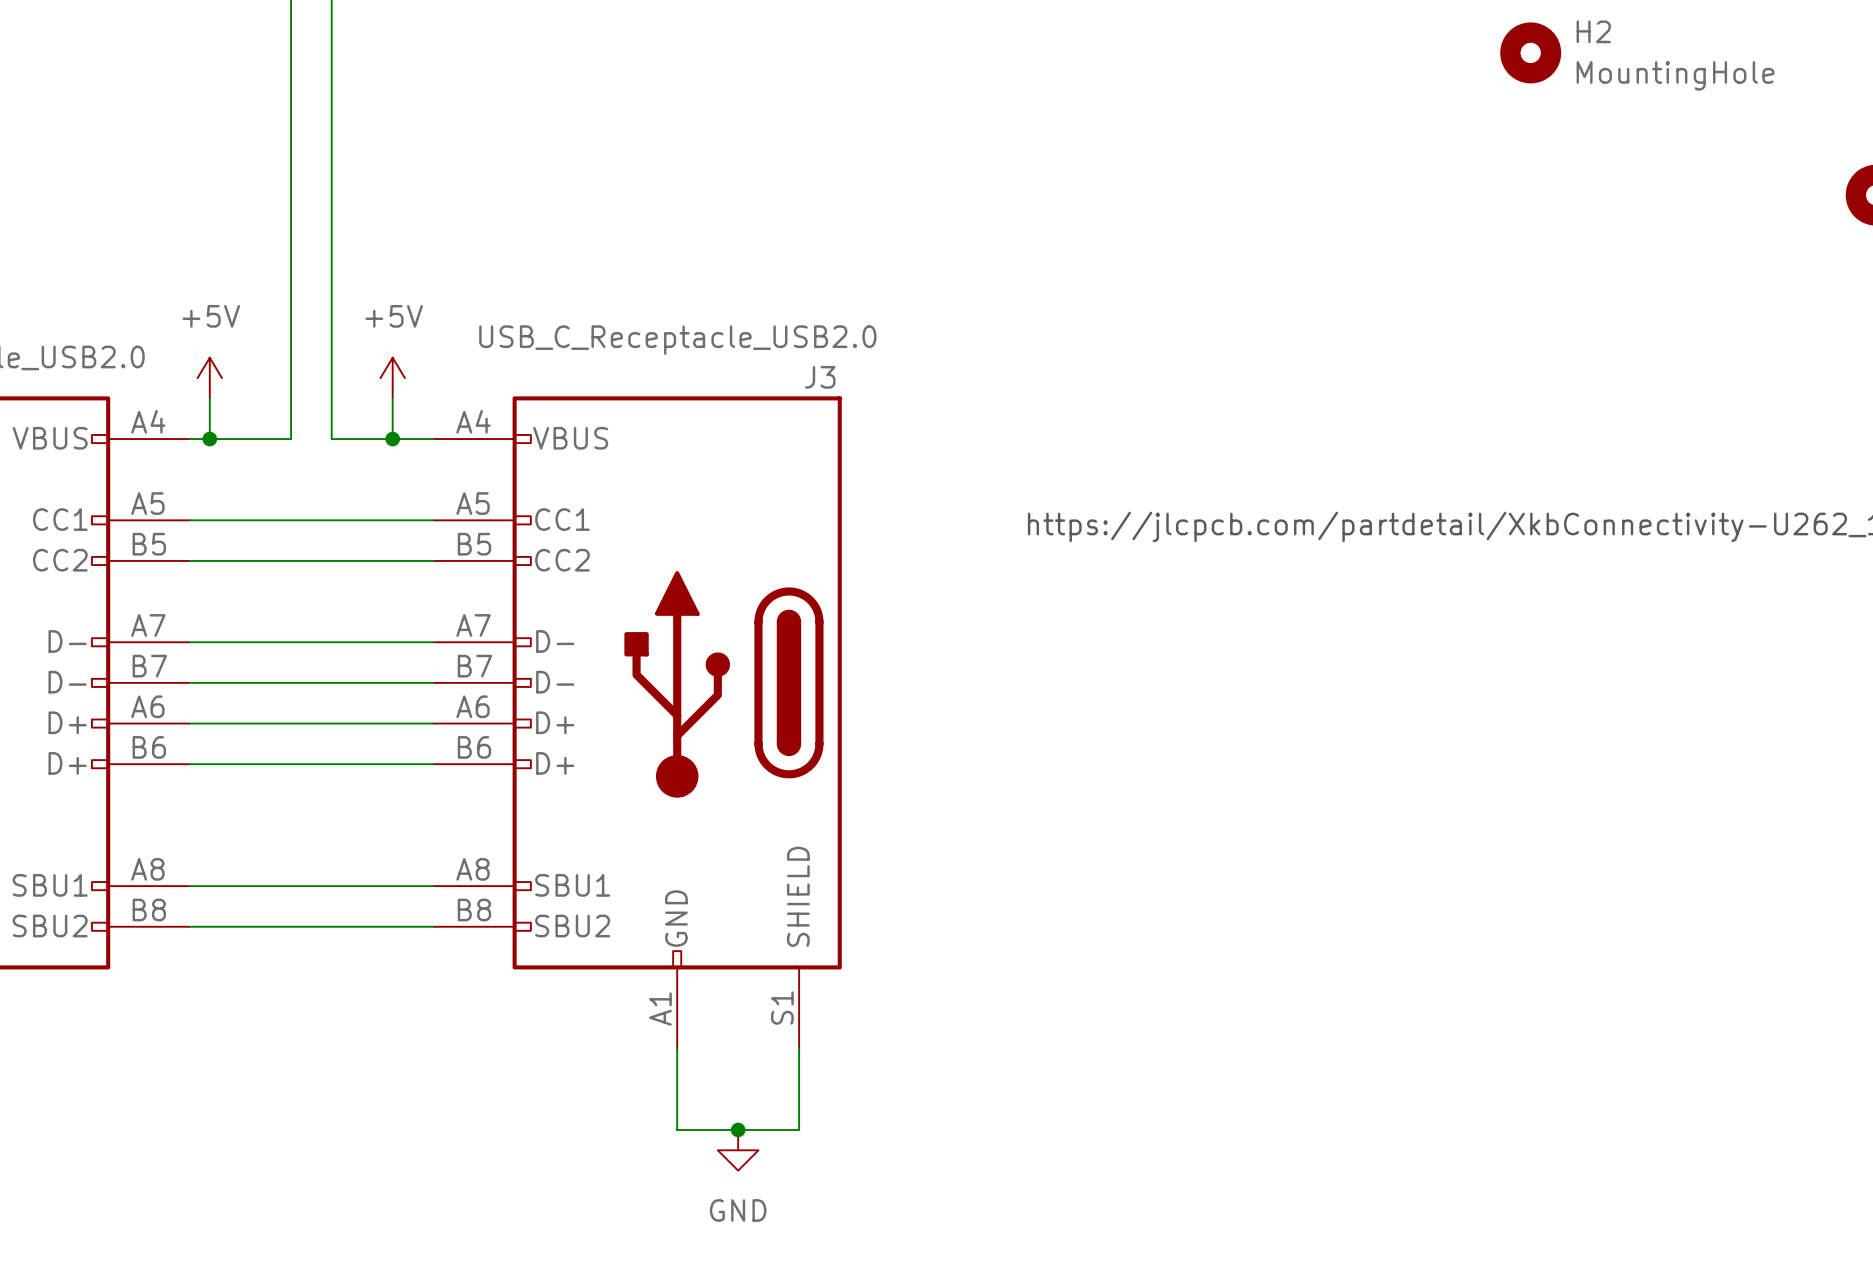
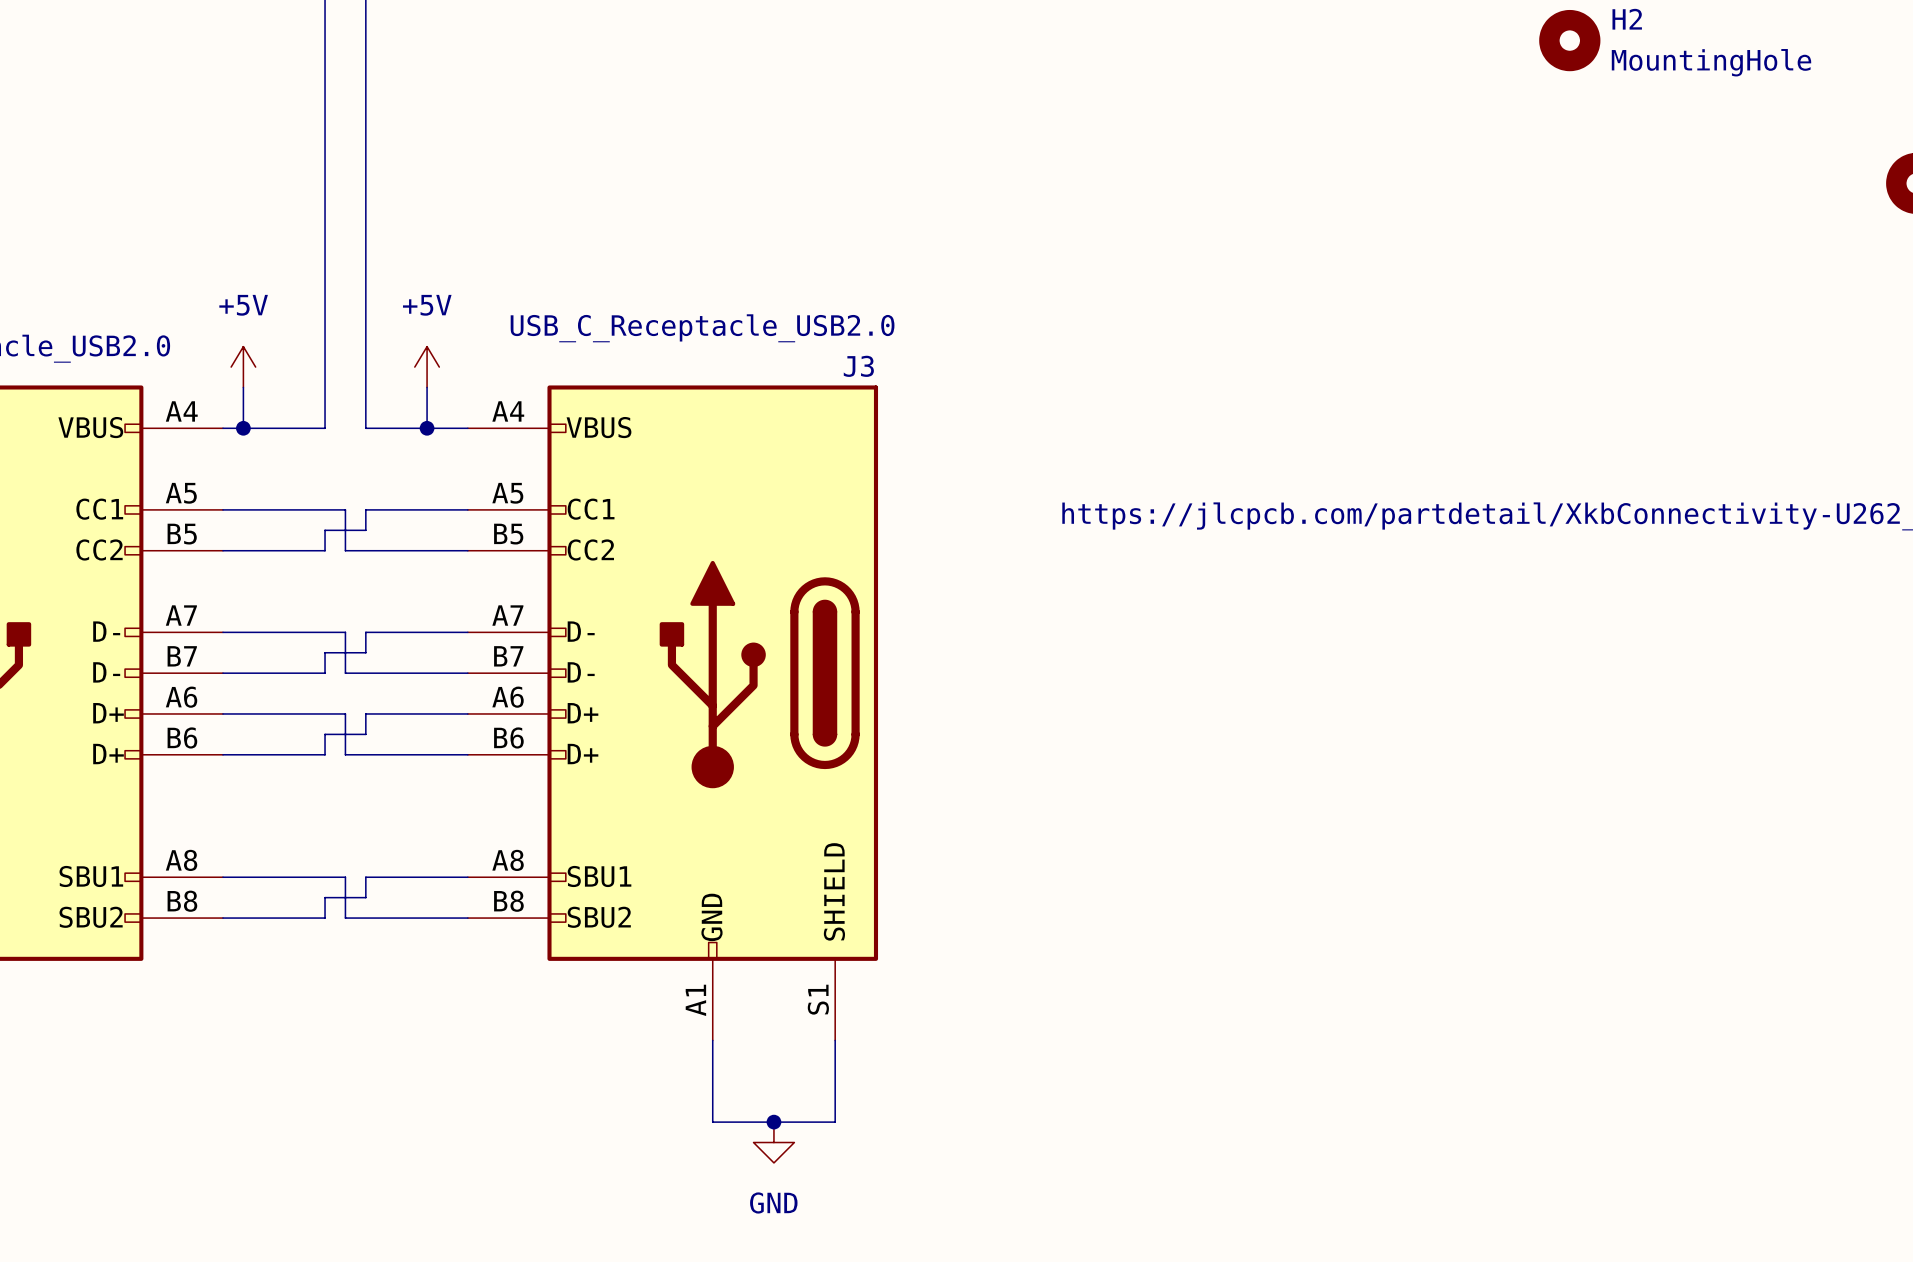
wire: (311, 520) (331, 520) -> (345, 509) (345, 550)
wire: (291, 560) (311, 560) -> (325, 550) (325, 530) (365, 530) (365, 509)
wire: (311, 642) (331, 642) -> (345, 632) (345, 673)
wire: (291, 682) (311, 682) -> (325, 673) (325, 652) (365, 652) (365, 632)
wire: (311, 723) (331, 723) -> (345, 713) (345, 754)
wire: (291, 764) (311, 764) -> (325, 754) (325, 734) (365, 734) (365, 713)
wire: (311, 886) (331, 886) -> (345, 877) (345, 918)
wire: (291, 926) (311, 926) -> (325, 918) (325, 897) (365, 897) (365, 877)

